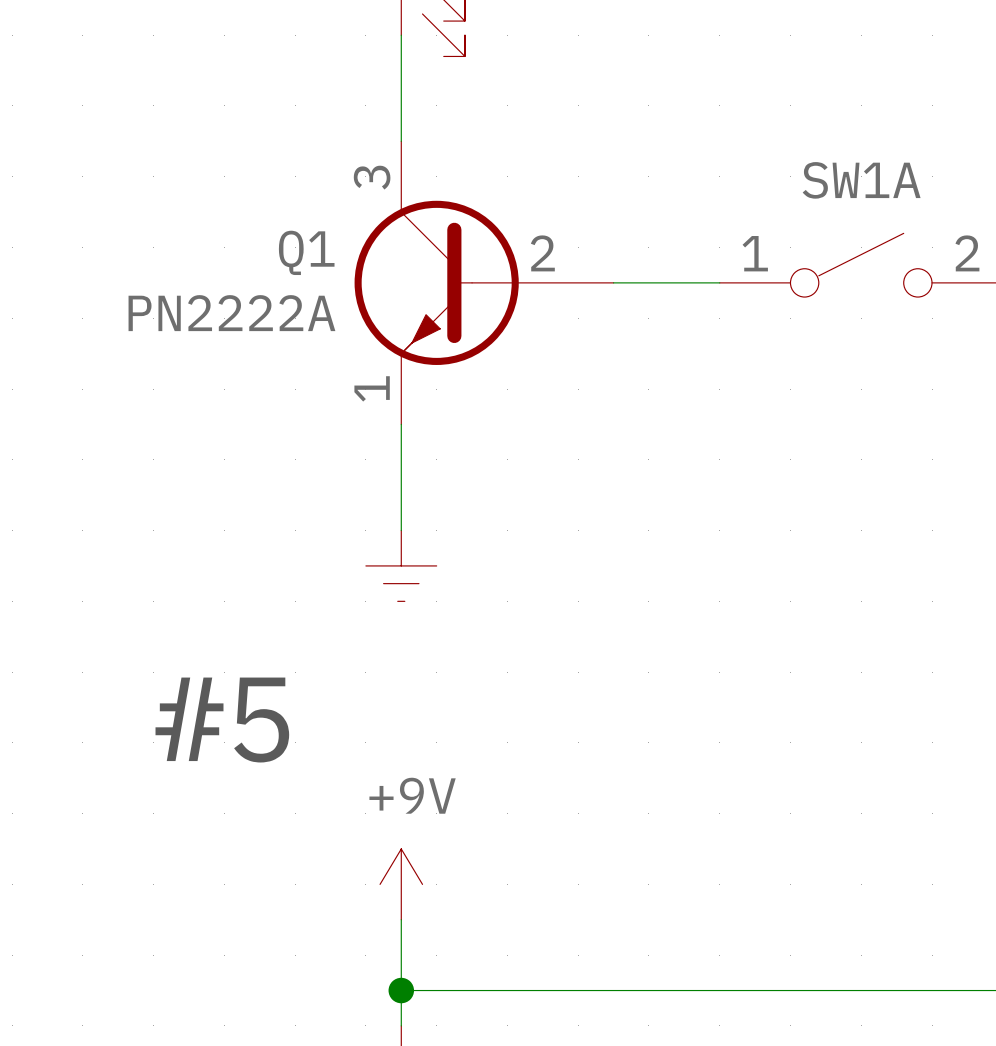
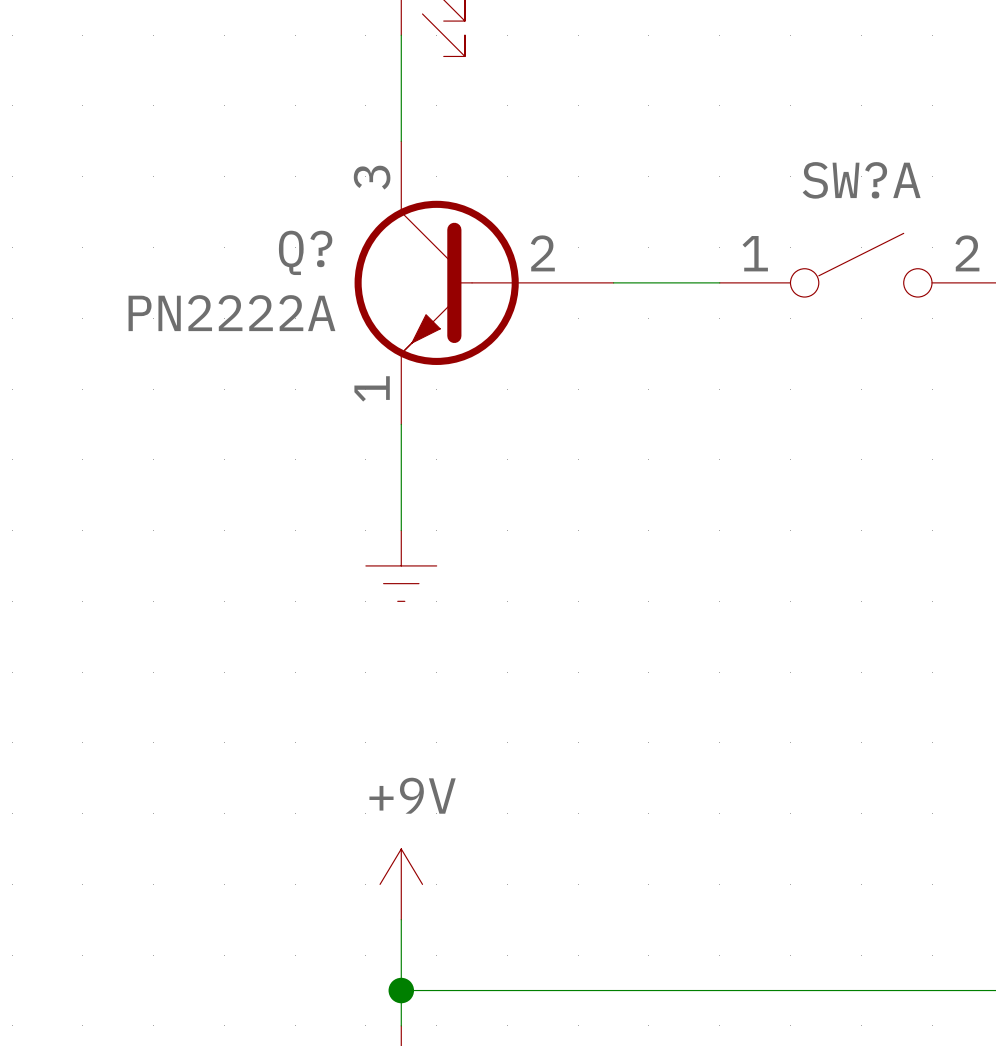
SW1A name: SW1A (861, 180) -> SW?A (861, 180)
Q1 name: Q1 (306, 252) -> Q? (305, 252)
text: #5 (222, 720) -> none

